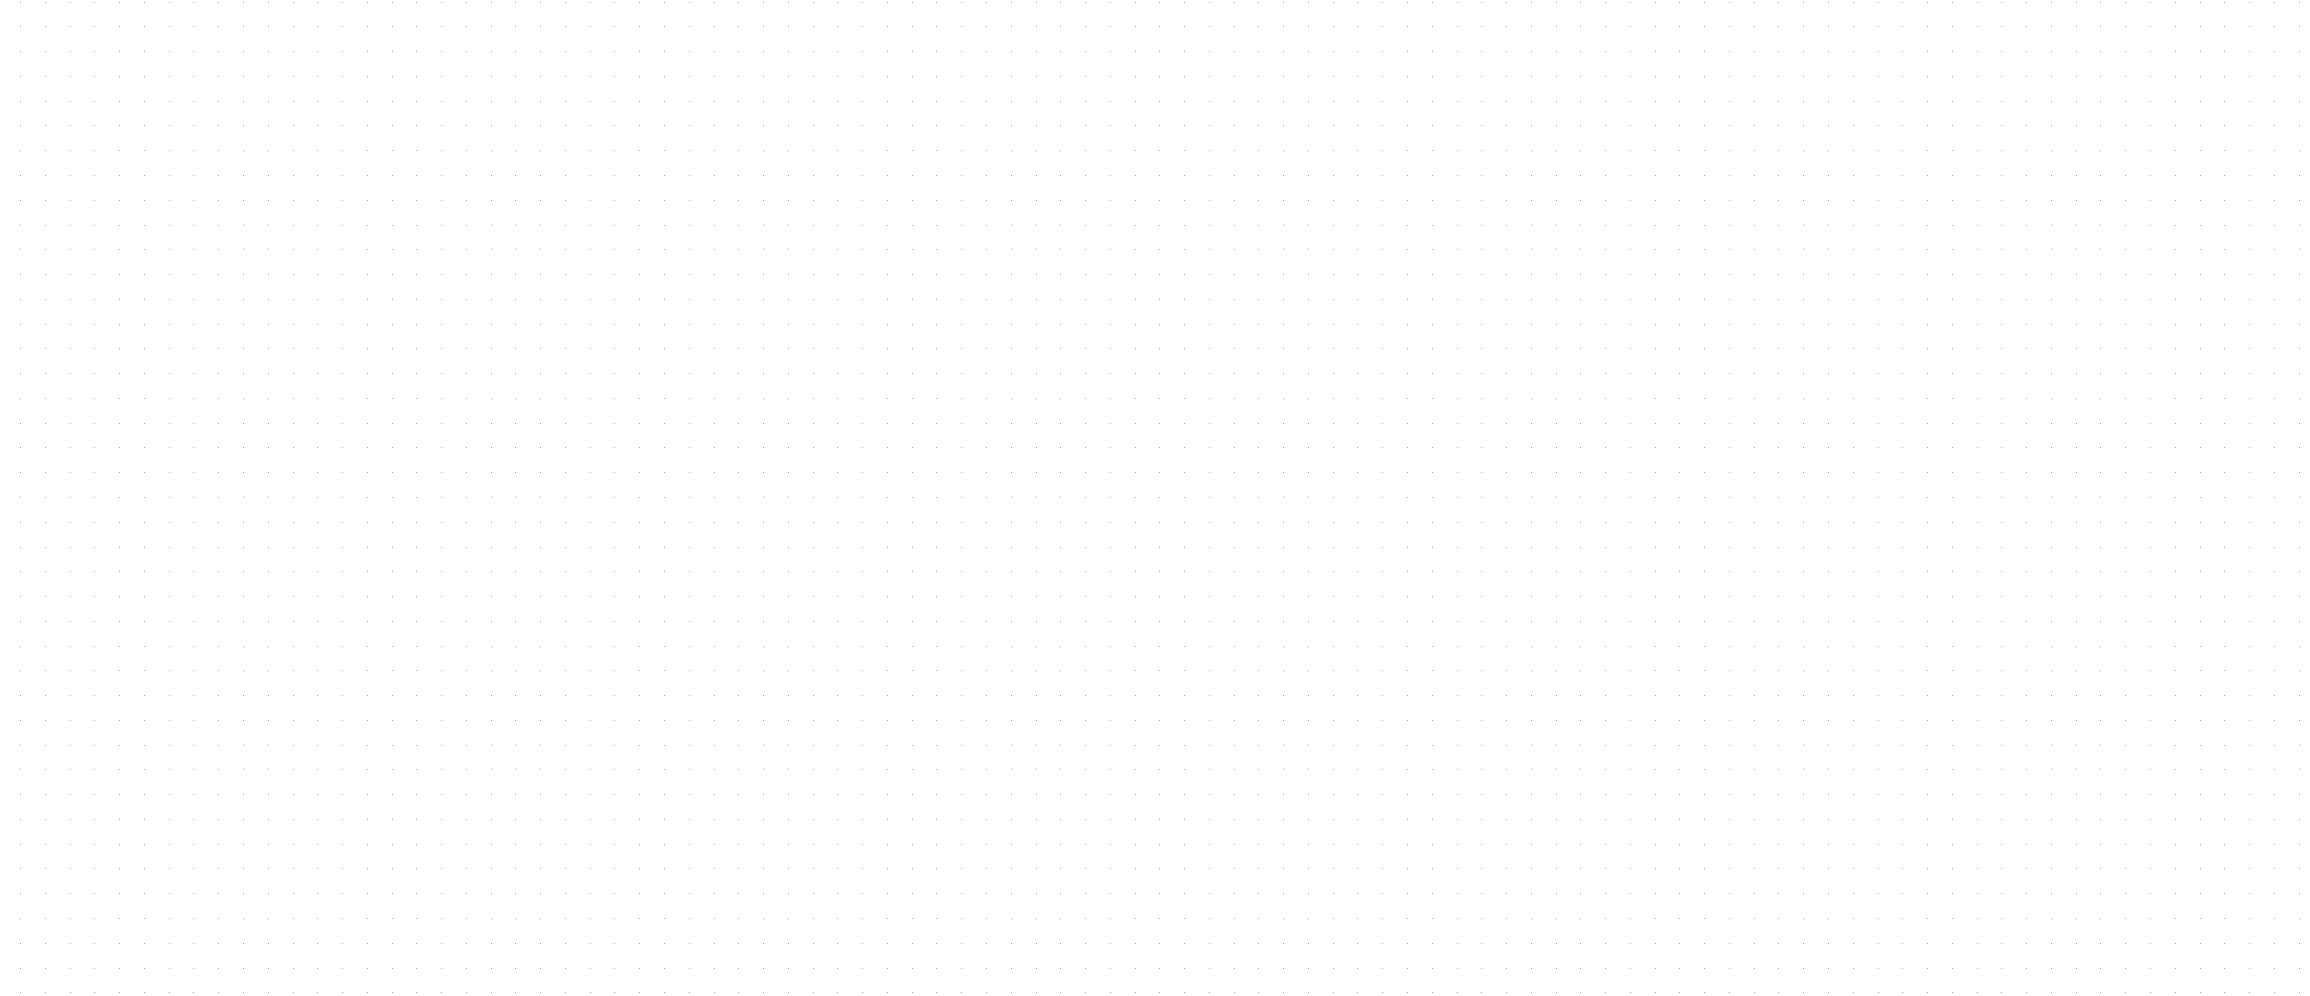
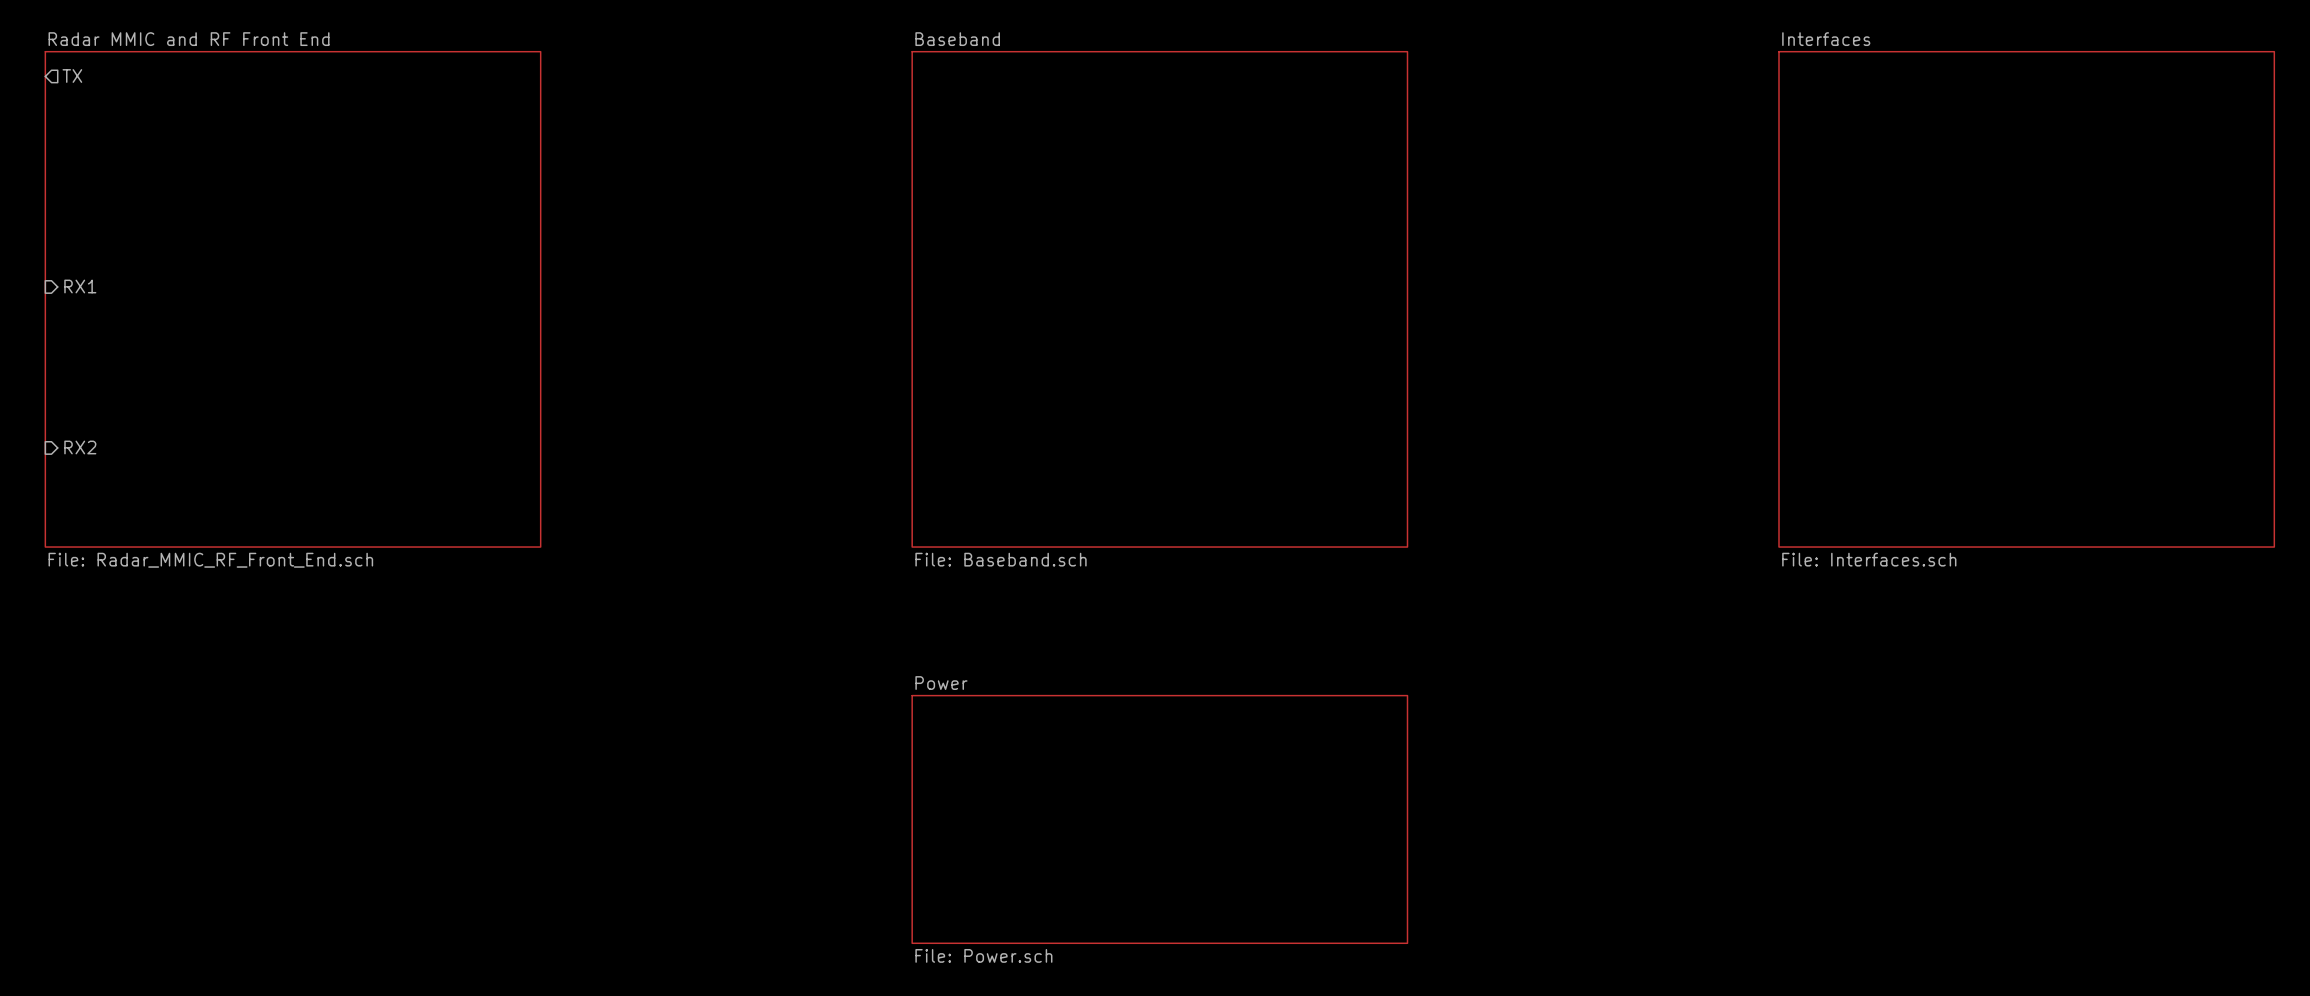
sheet pin: none -> TX (72, 75)
sheet pin: none -> RX1 (80, 286)
sheet Radar MMIC and RF Front End: none -> File: Radar_MMIC_RF_Front_End.sch (293, 299)
sheet Baseband: none -> File: Baseband.sch (1159, 299)
sheet Interfaces: none -> File: Interfaces.sch (2026, 299)
sheet pin: none -> RX2 (80, 447)
sheet Power: none -> File: Power.sch (1159, 819)

